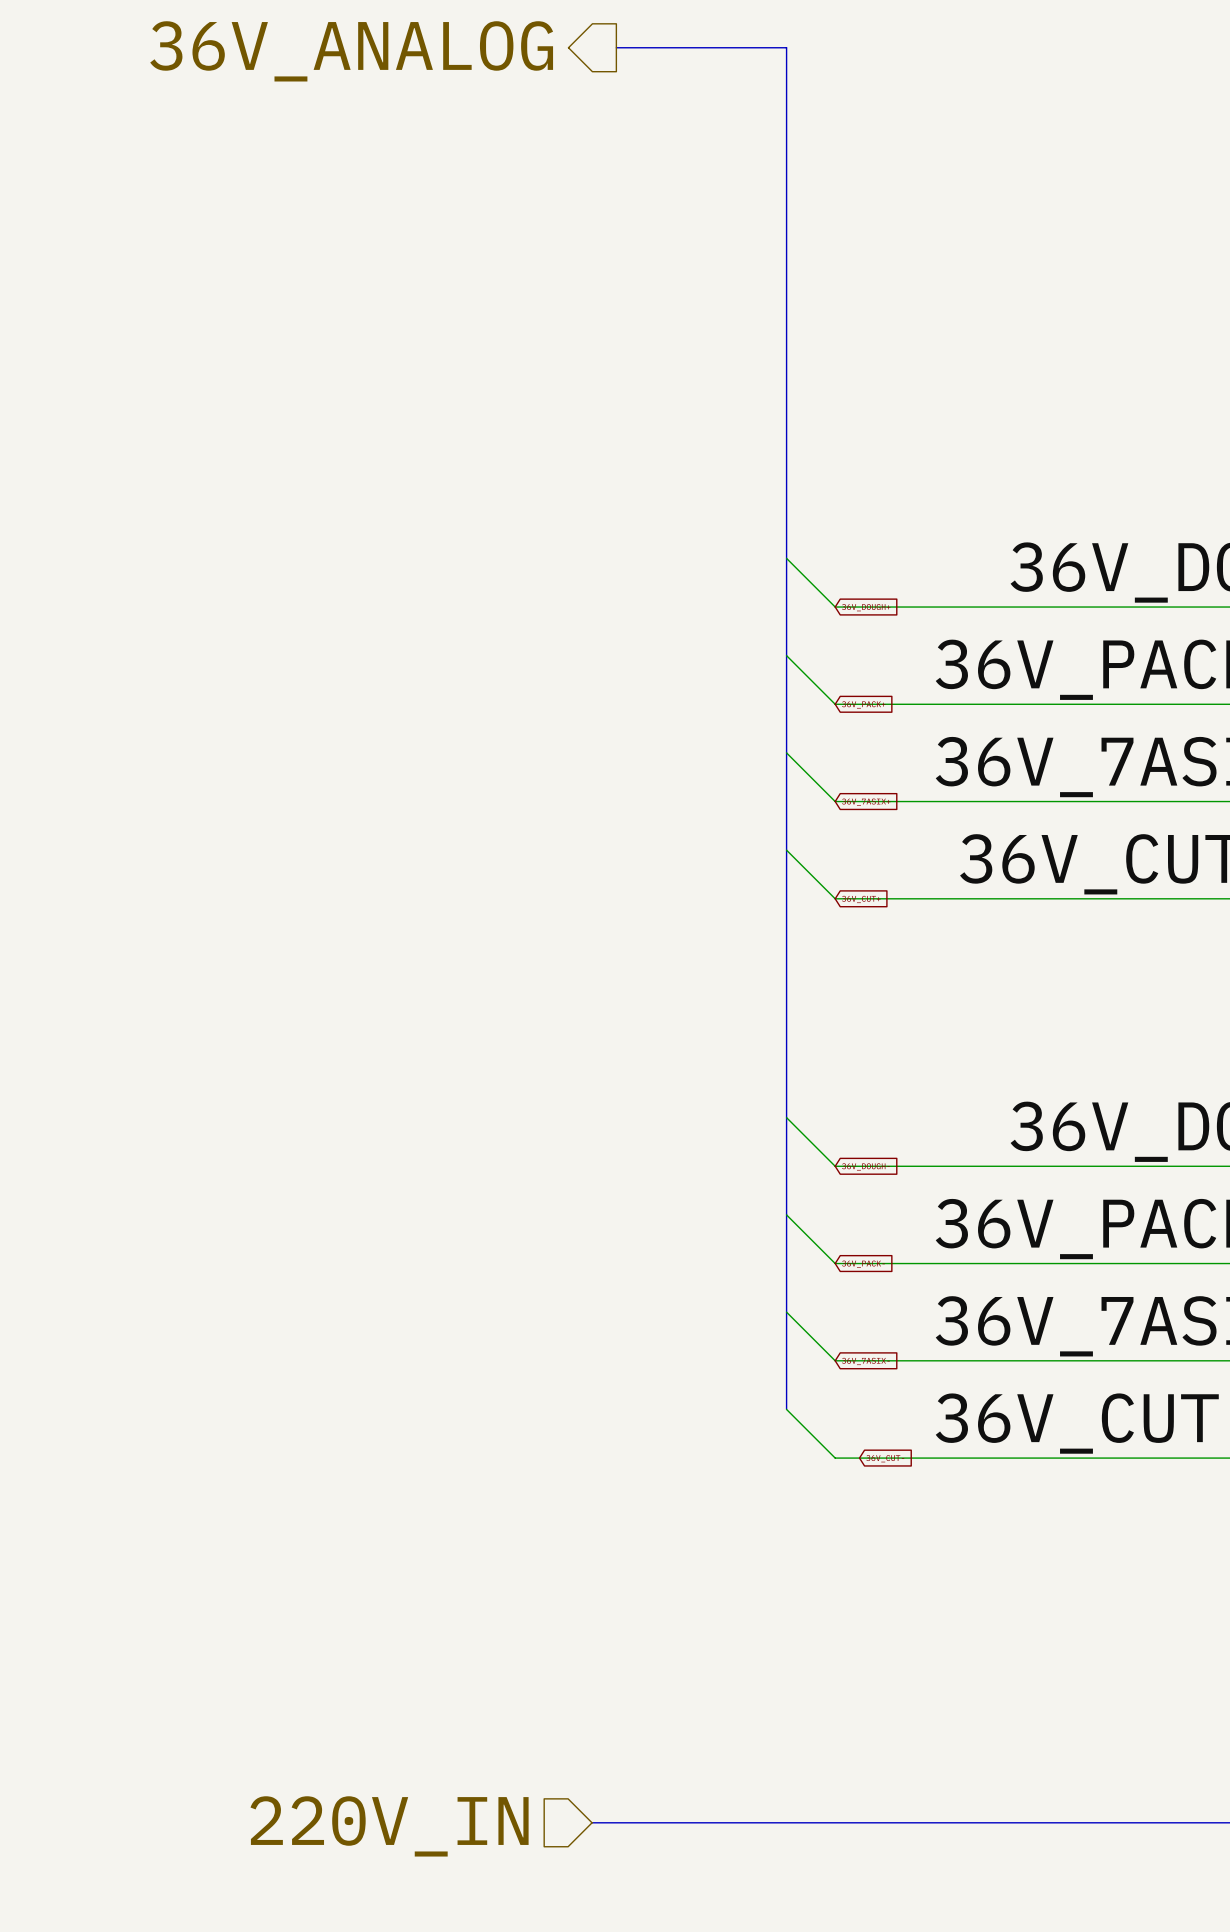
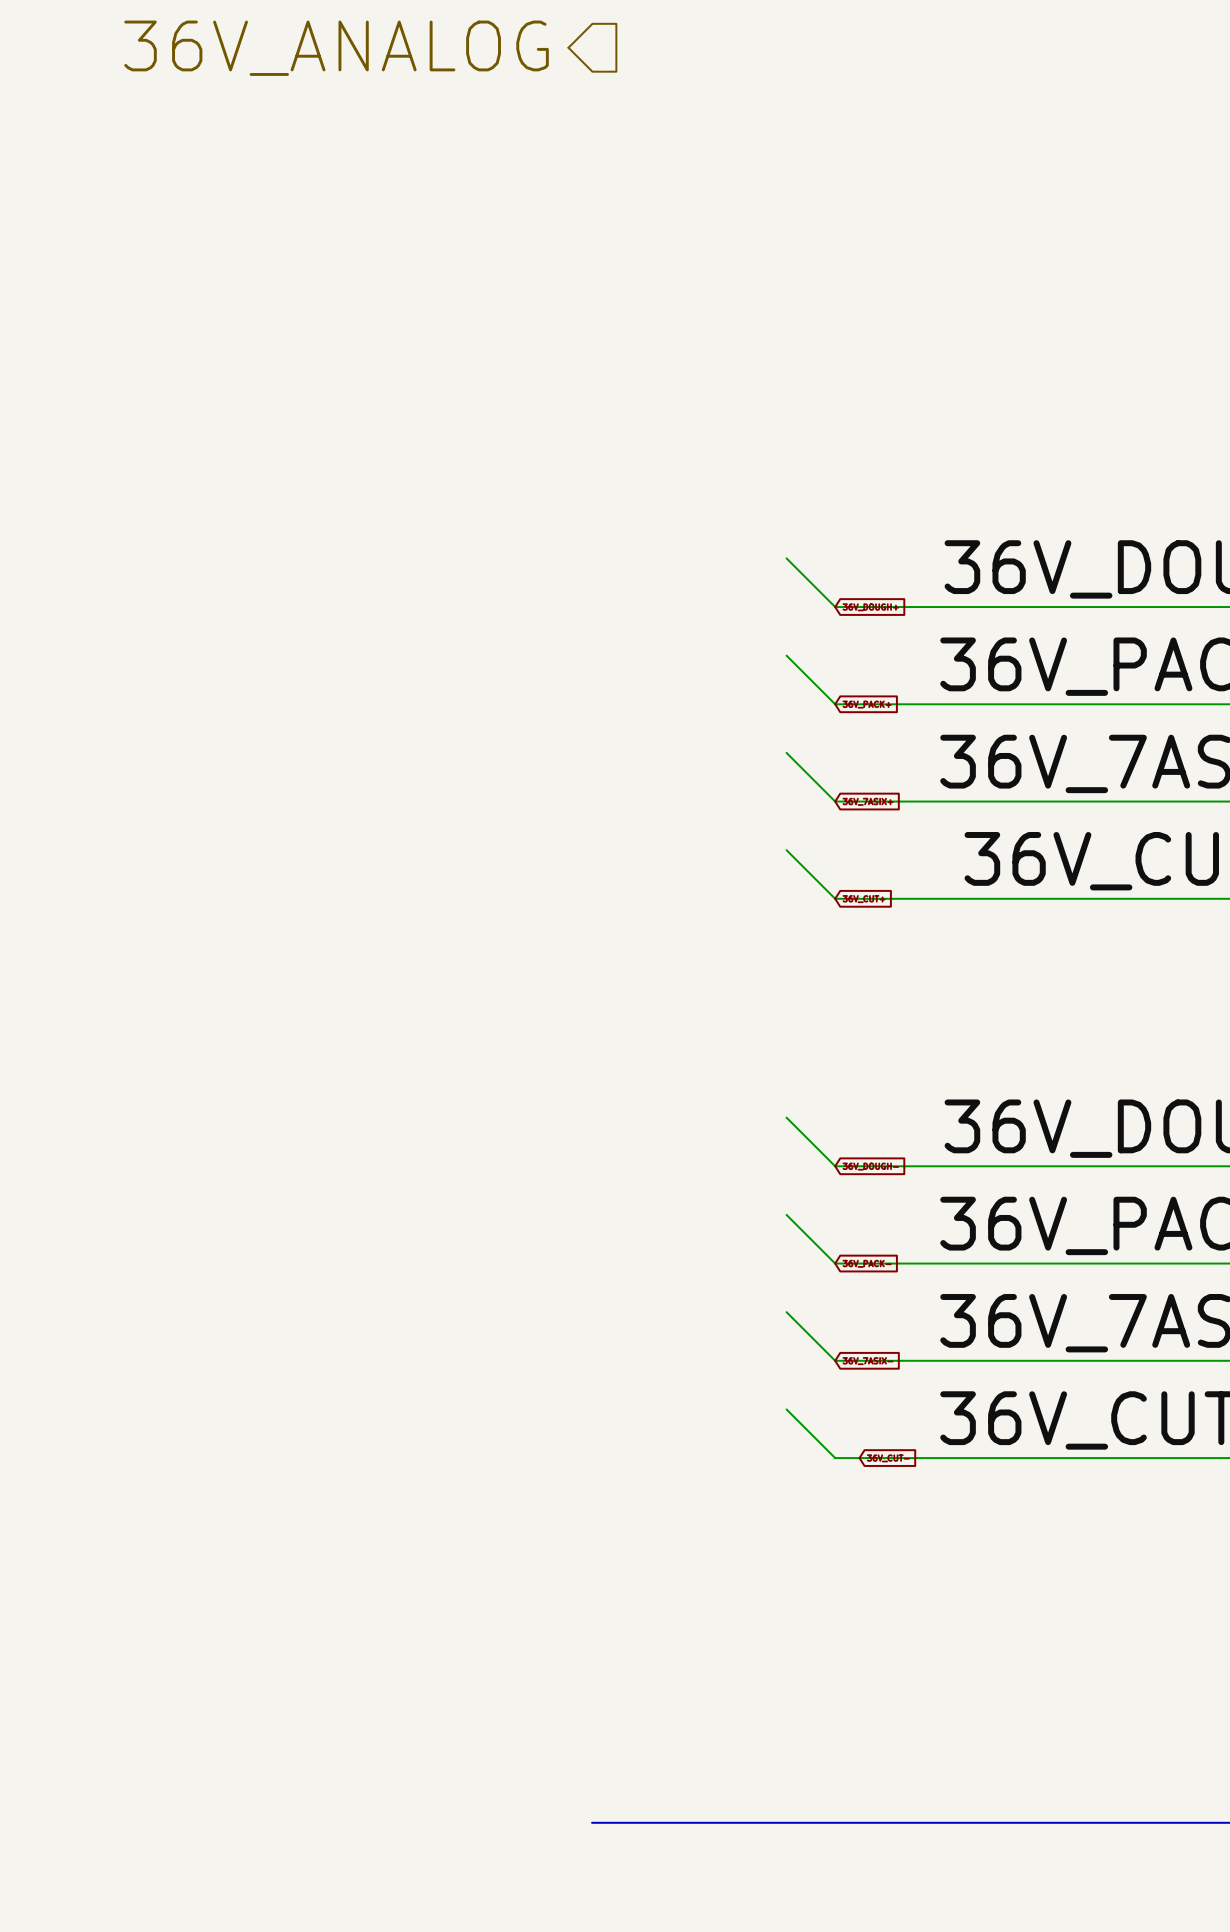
bus: (616, 47) (786, 47) (786, 1409) -> none
hierarchical label: 220V_IN (389, 1826) -> none

